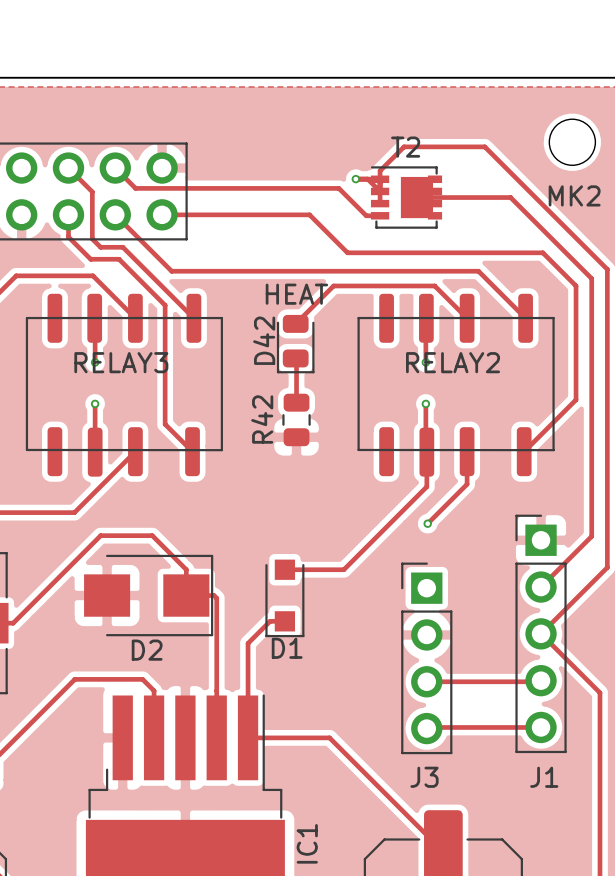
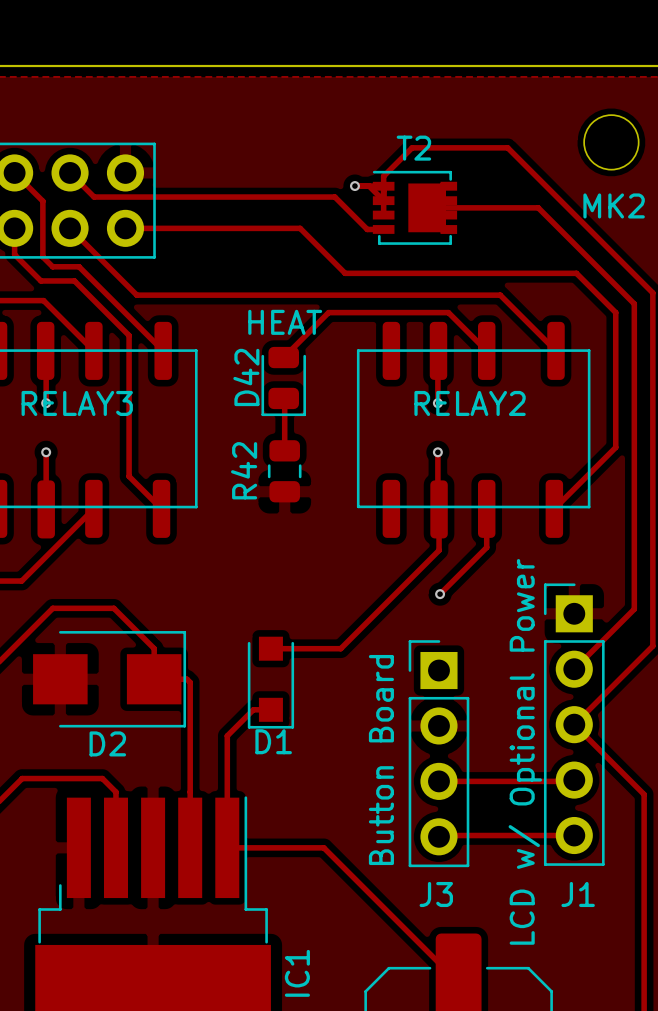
text: none -> LCD w/ Optional Power (525, 751)
text: none -> Button Board (381, 760)

